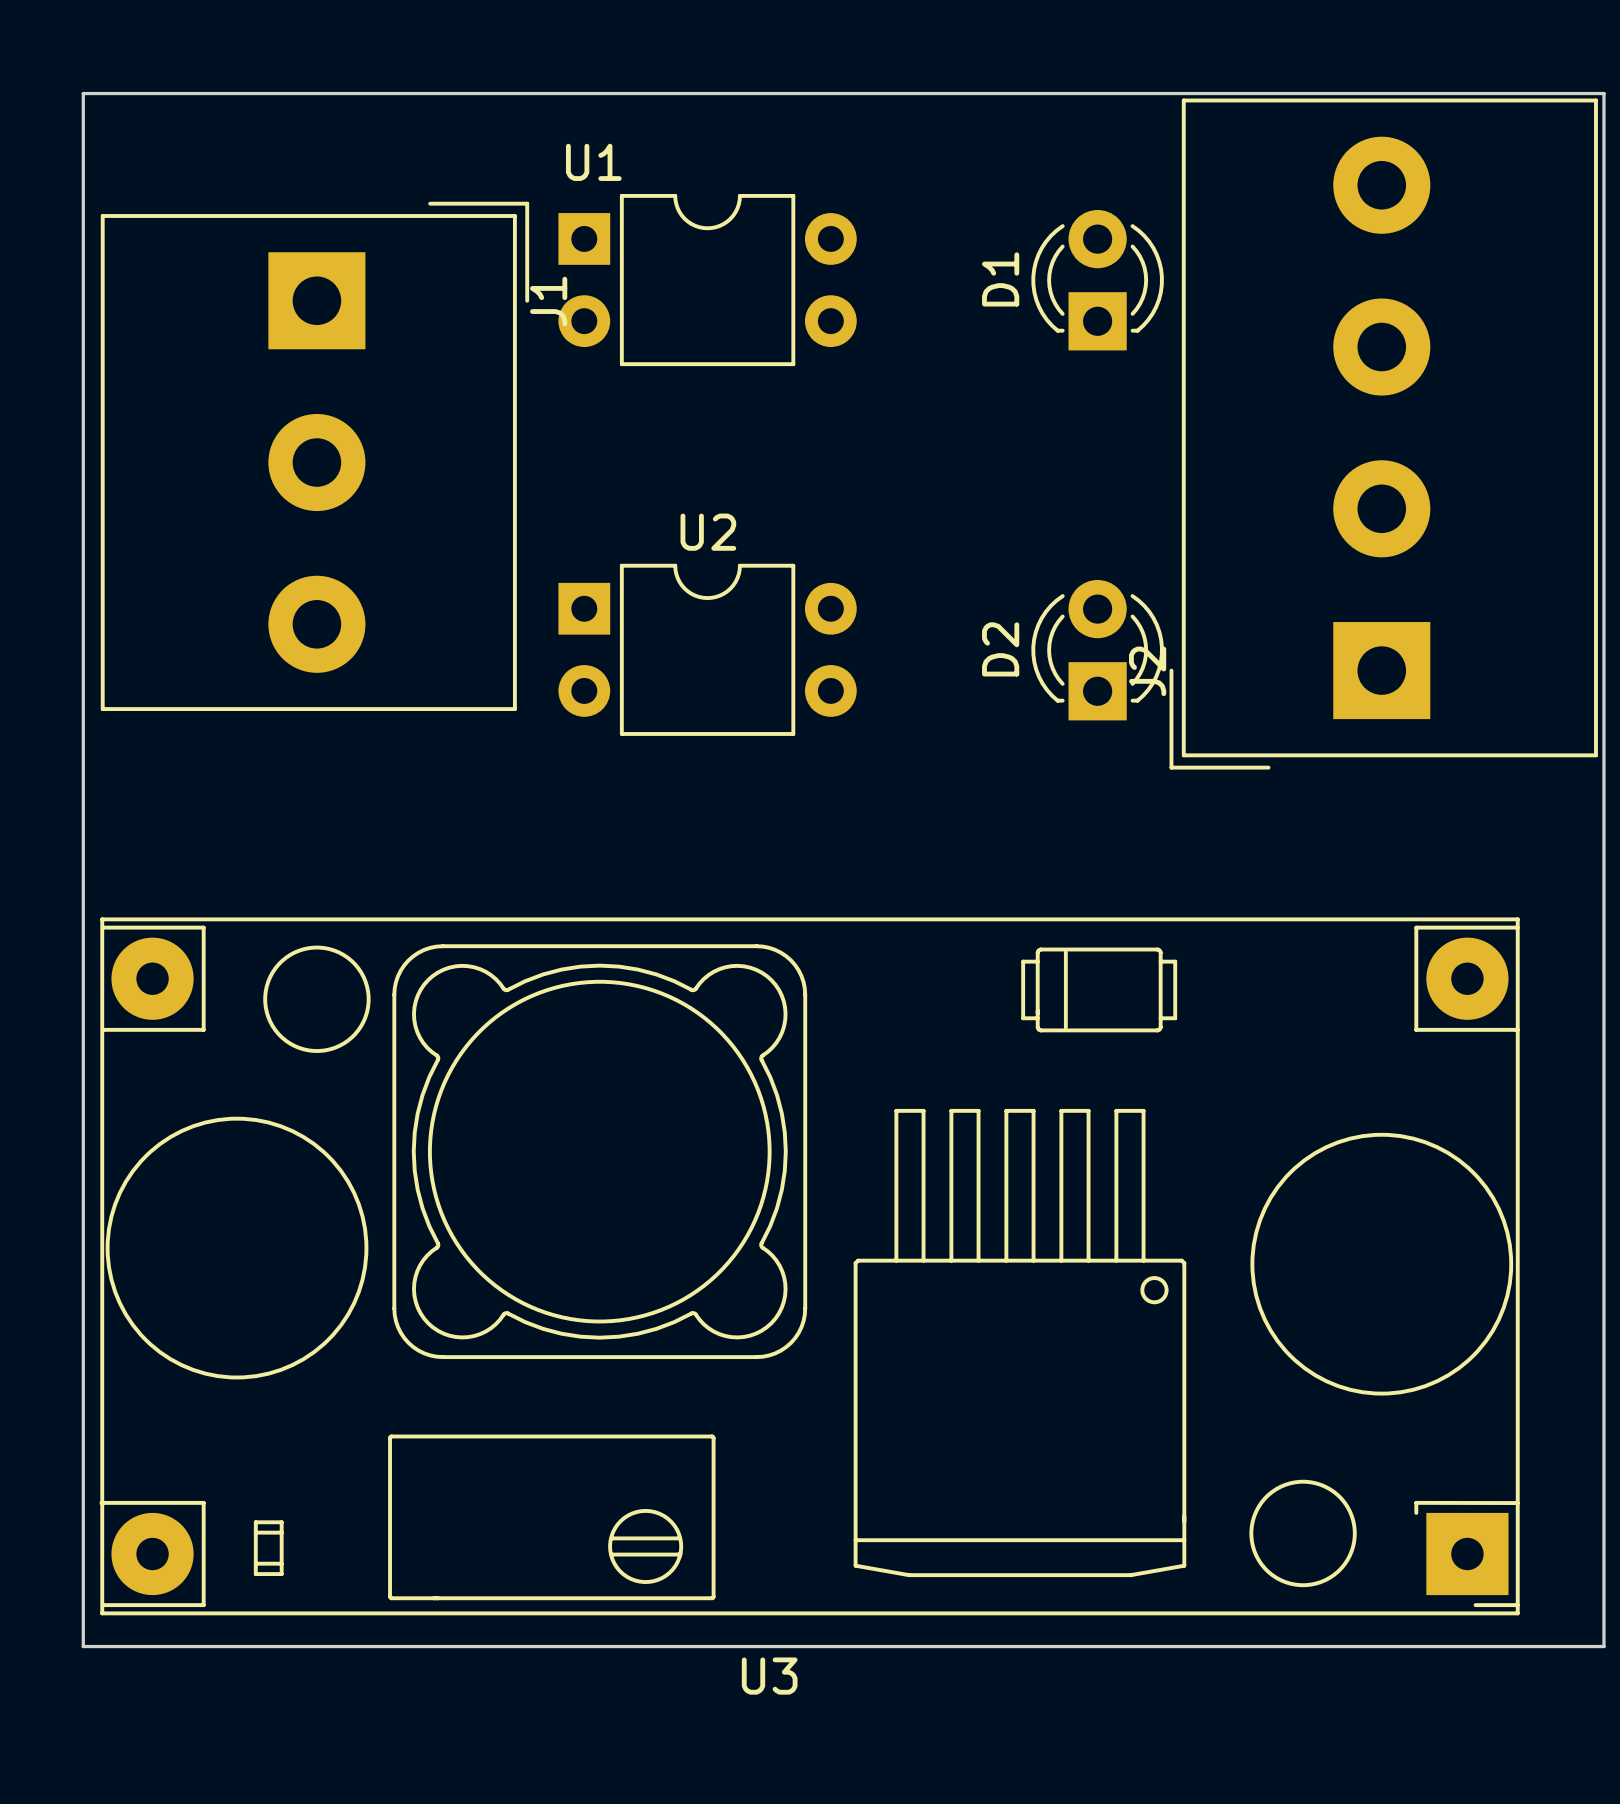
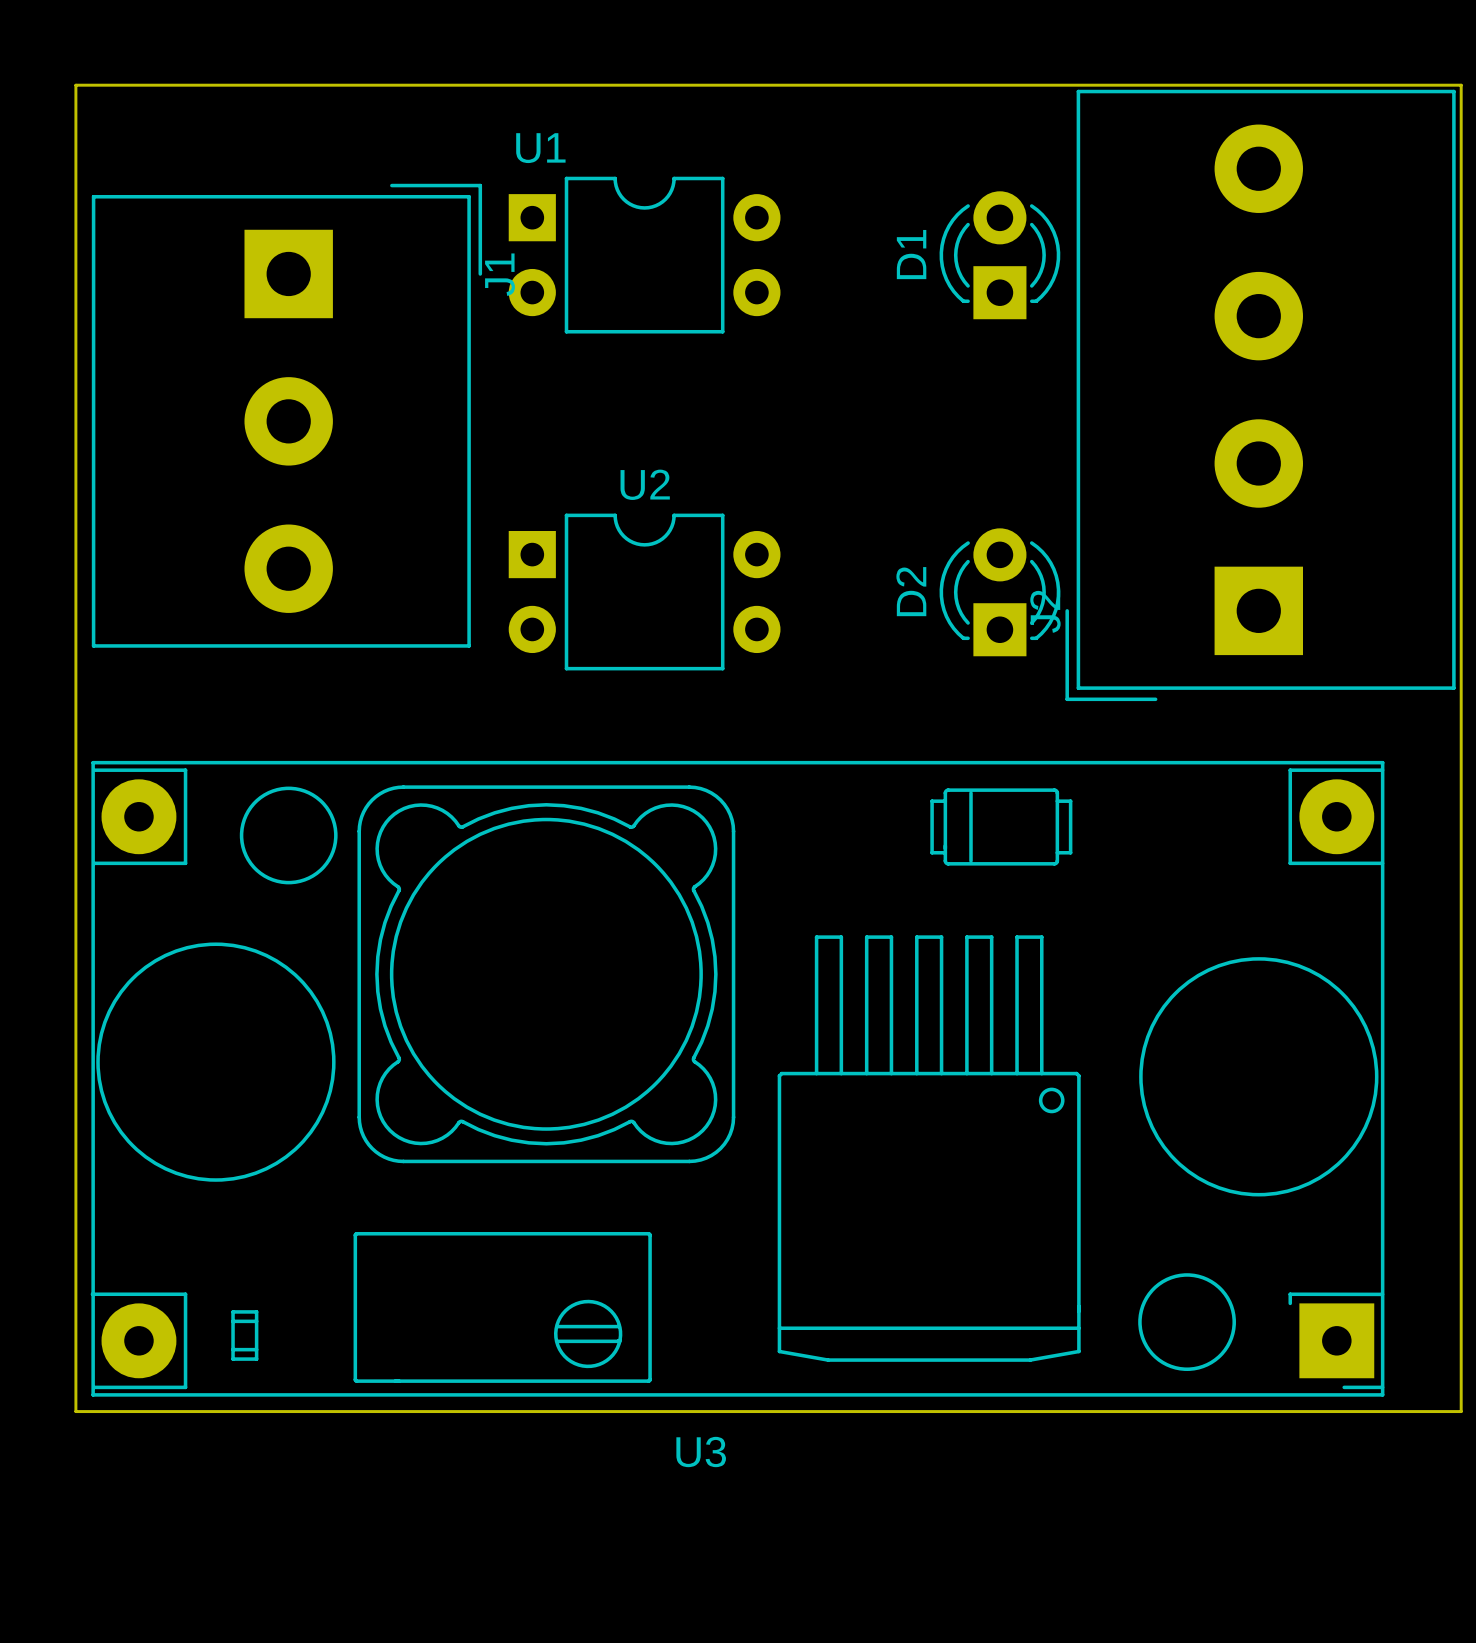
U3 footprint: [99, 917, 1520, 1616] -> [90, 760, 1385, 1397]
board edge: (83, 1549) (83, 1646) (1603, 1646) (1603, 1549) -> (75, 1411) (1461, 1411)

